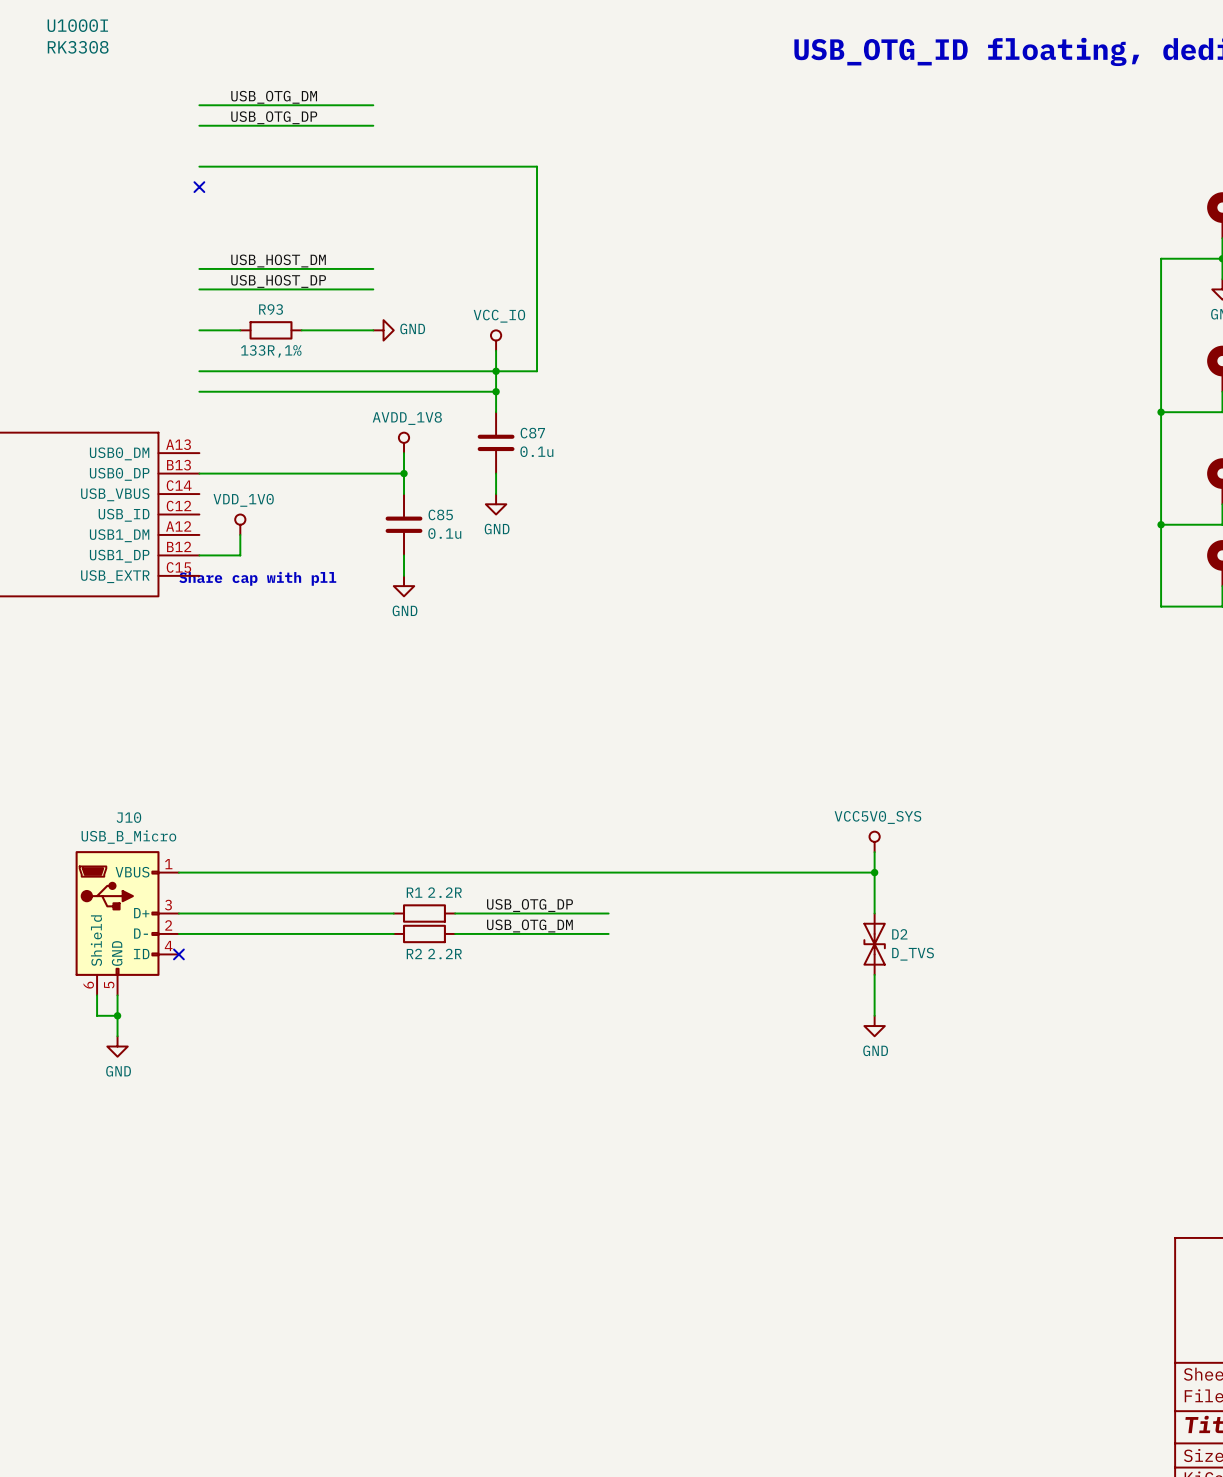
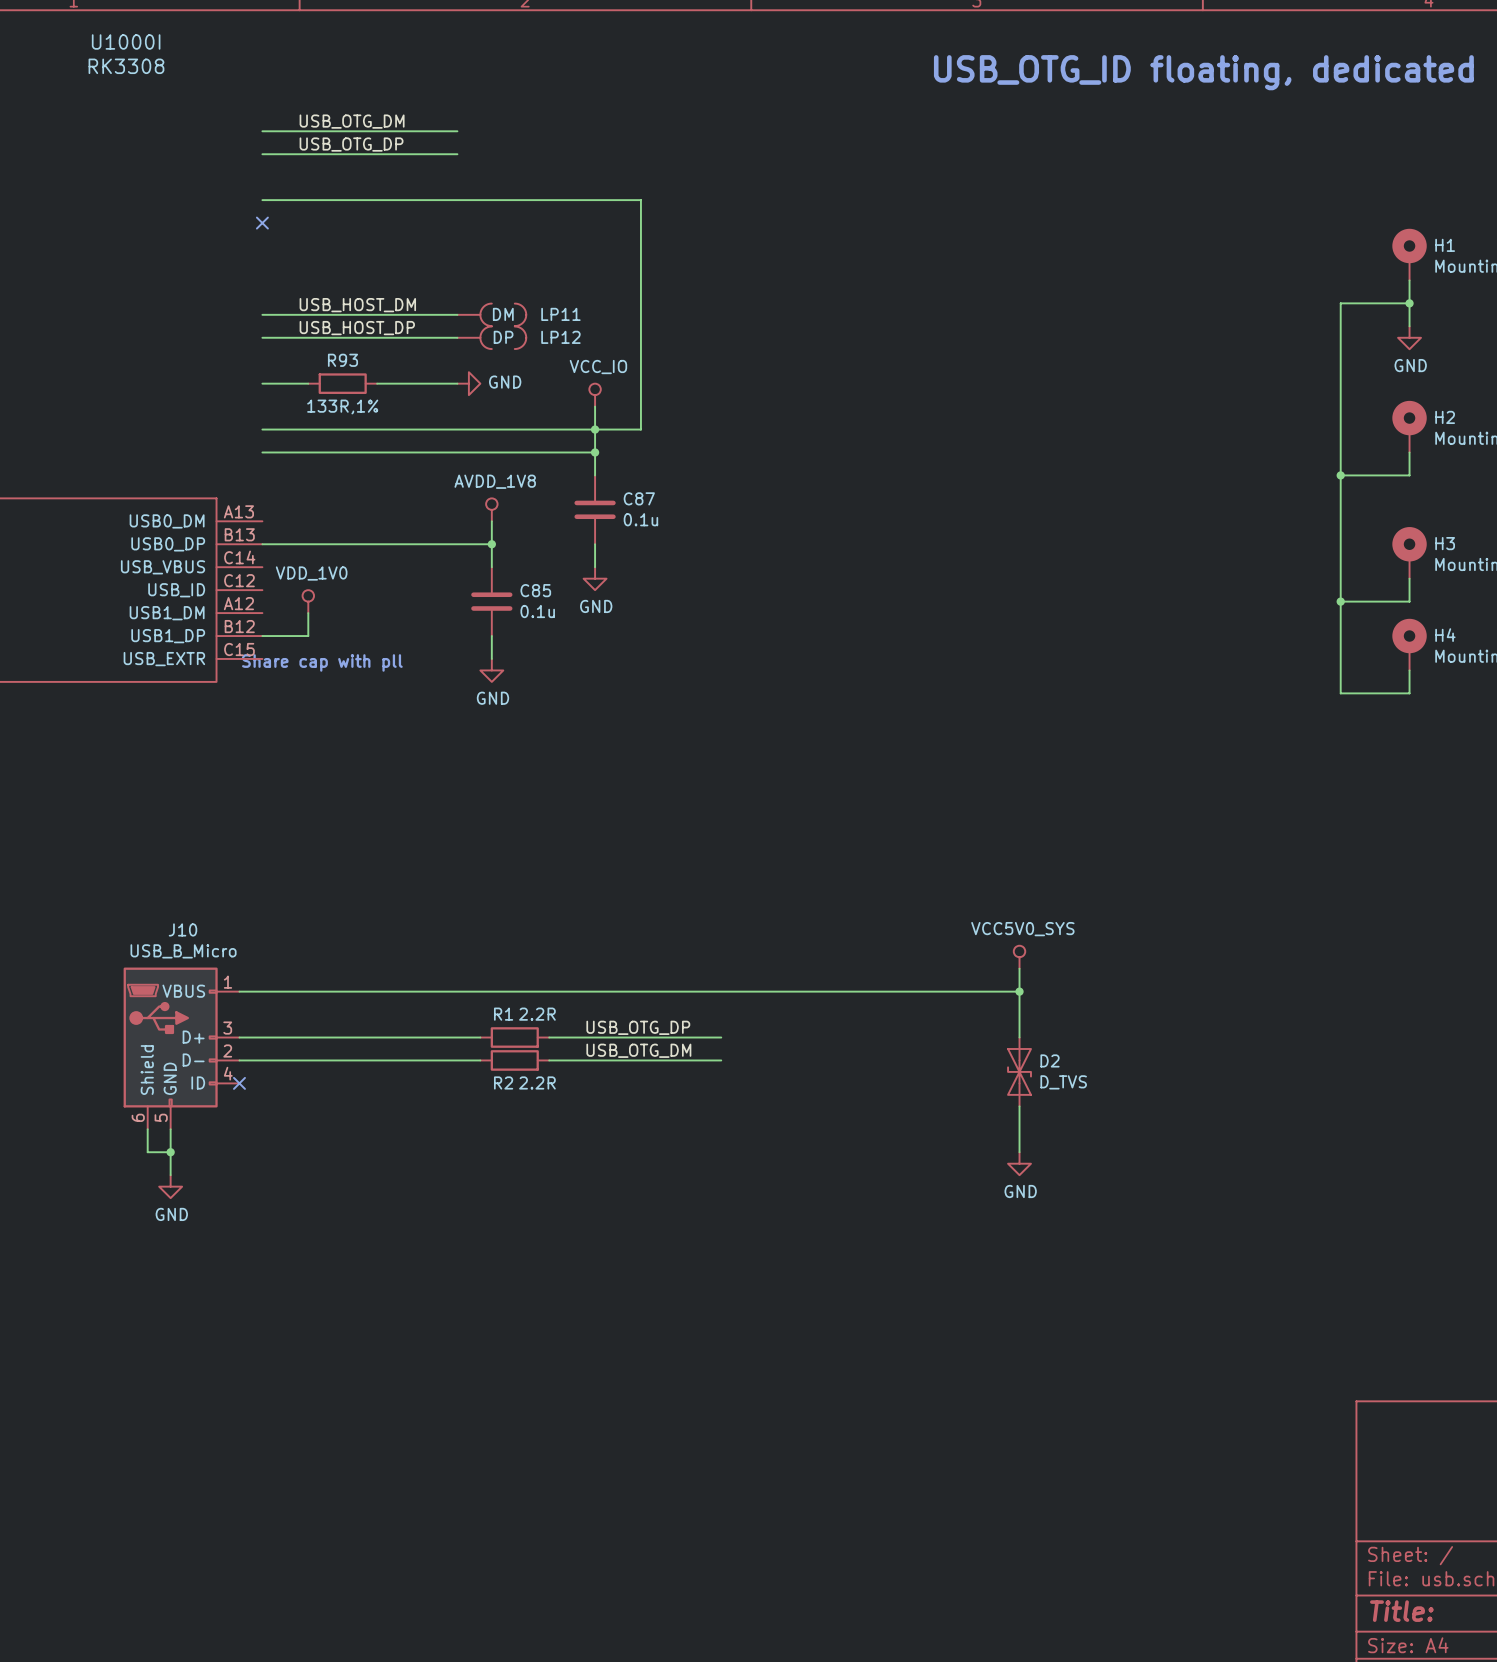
LP11: none -> DM (491, 314)
LP12: none -> DP (491, 337)

